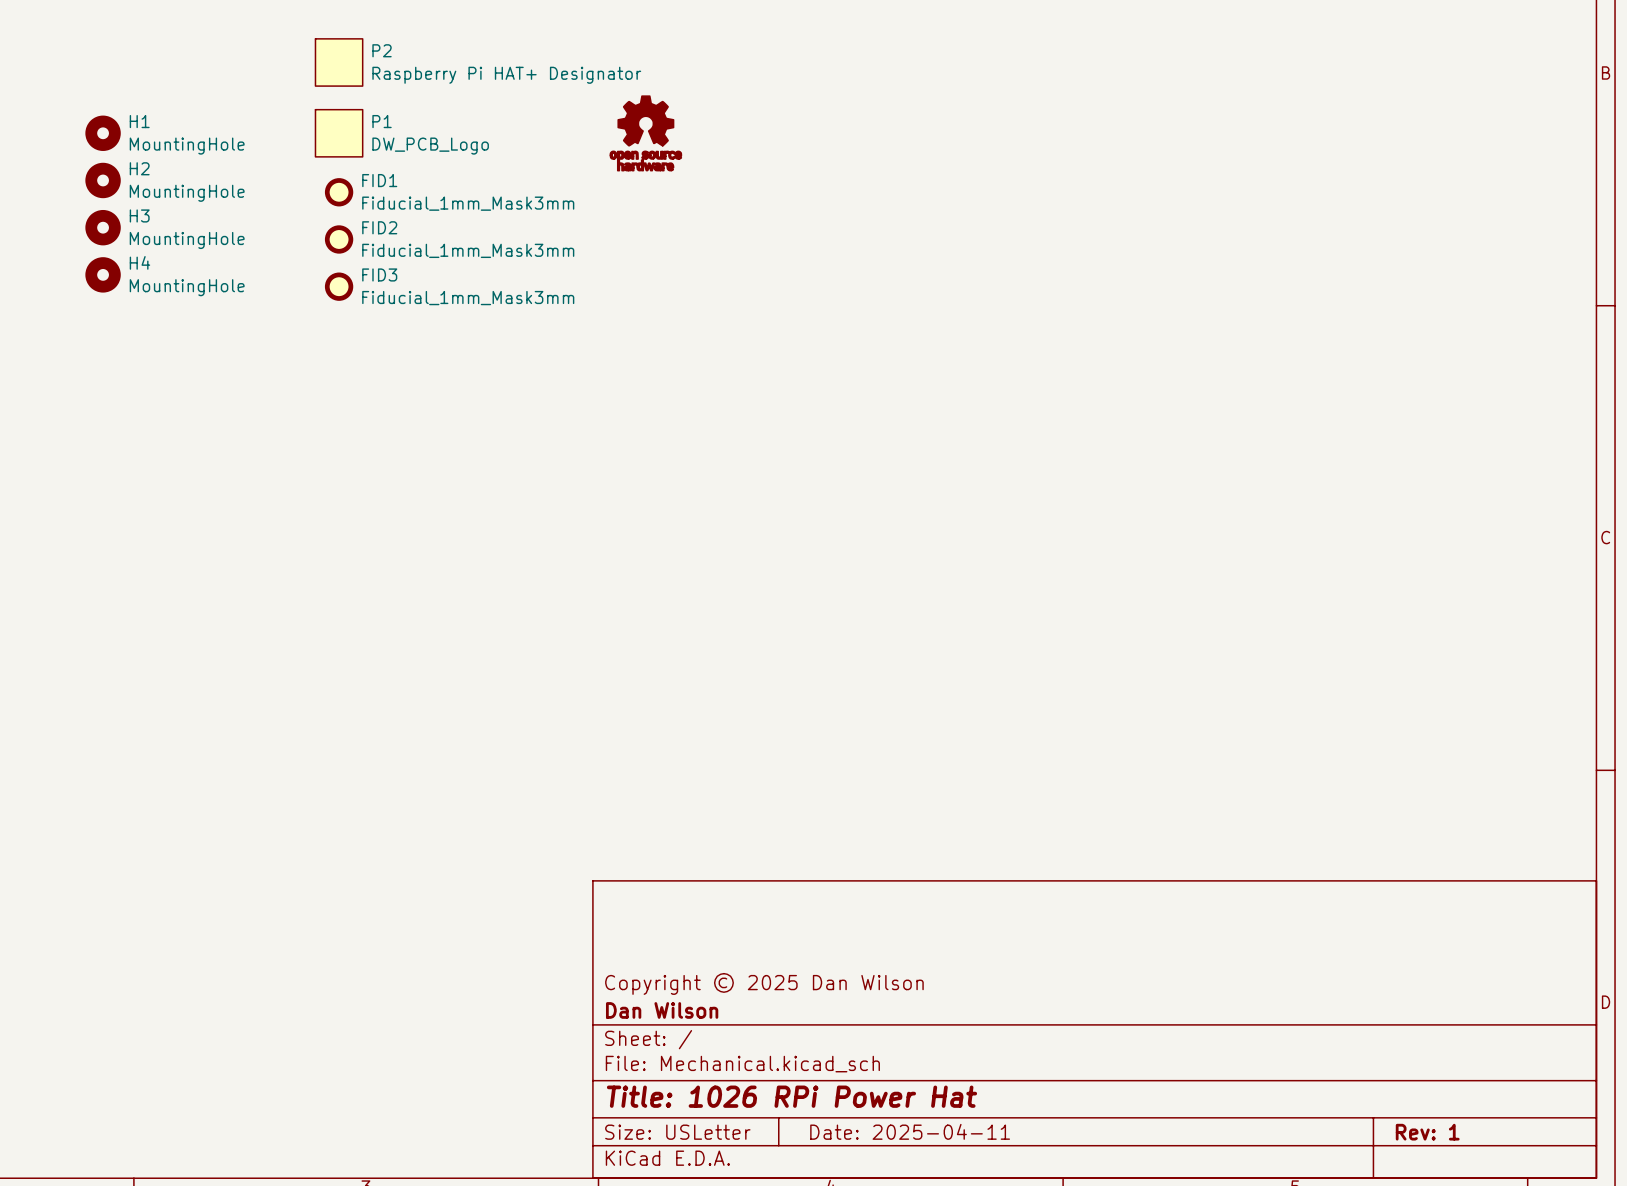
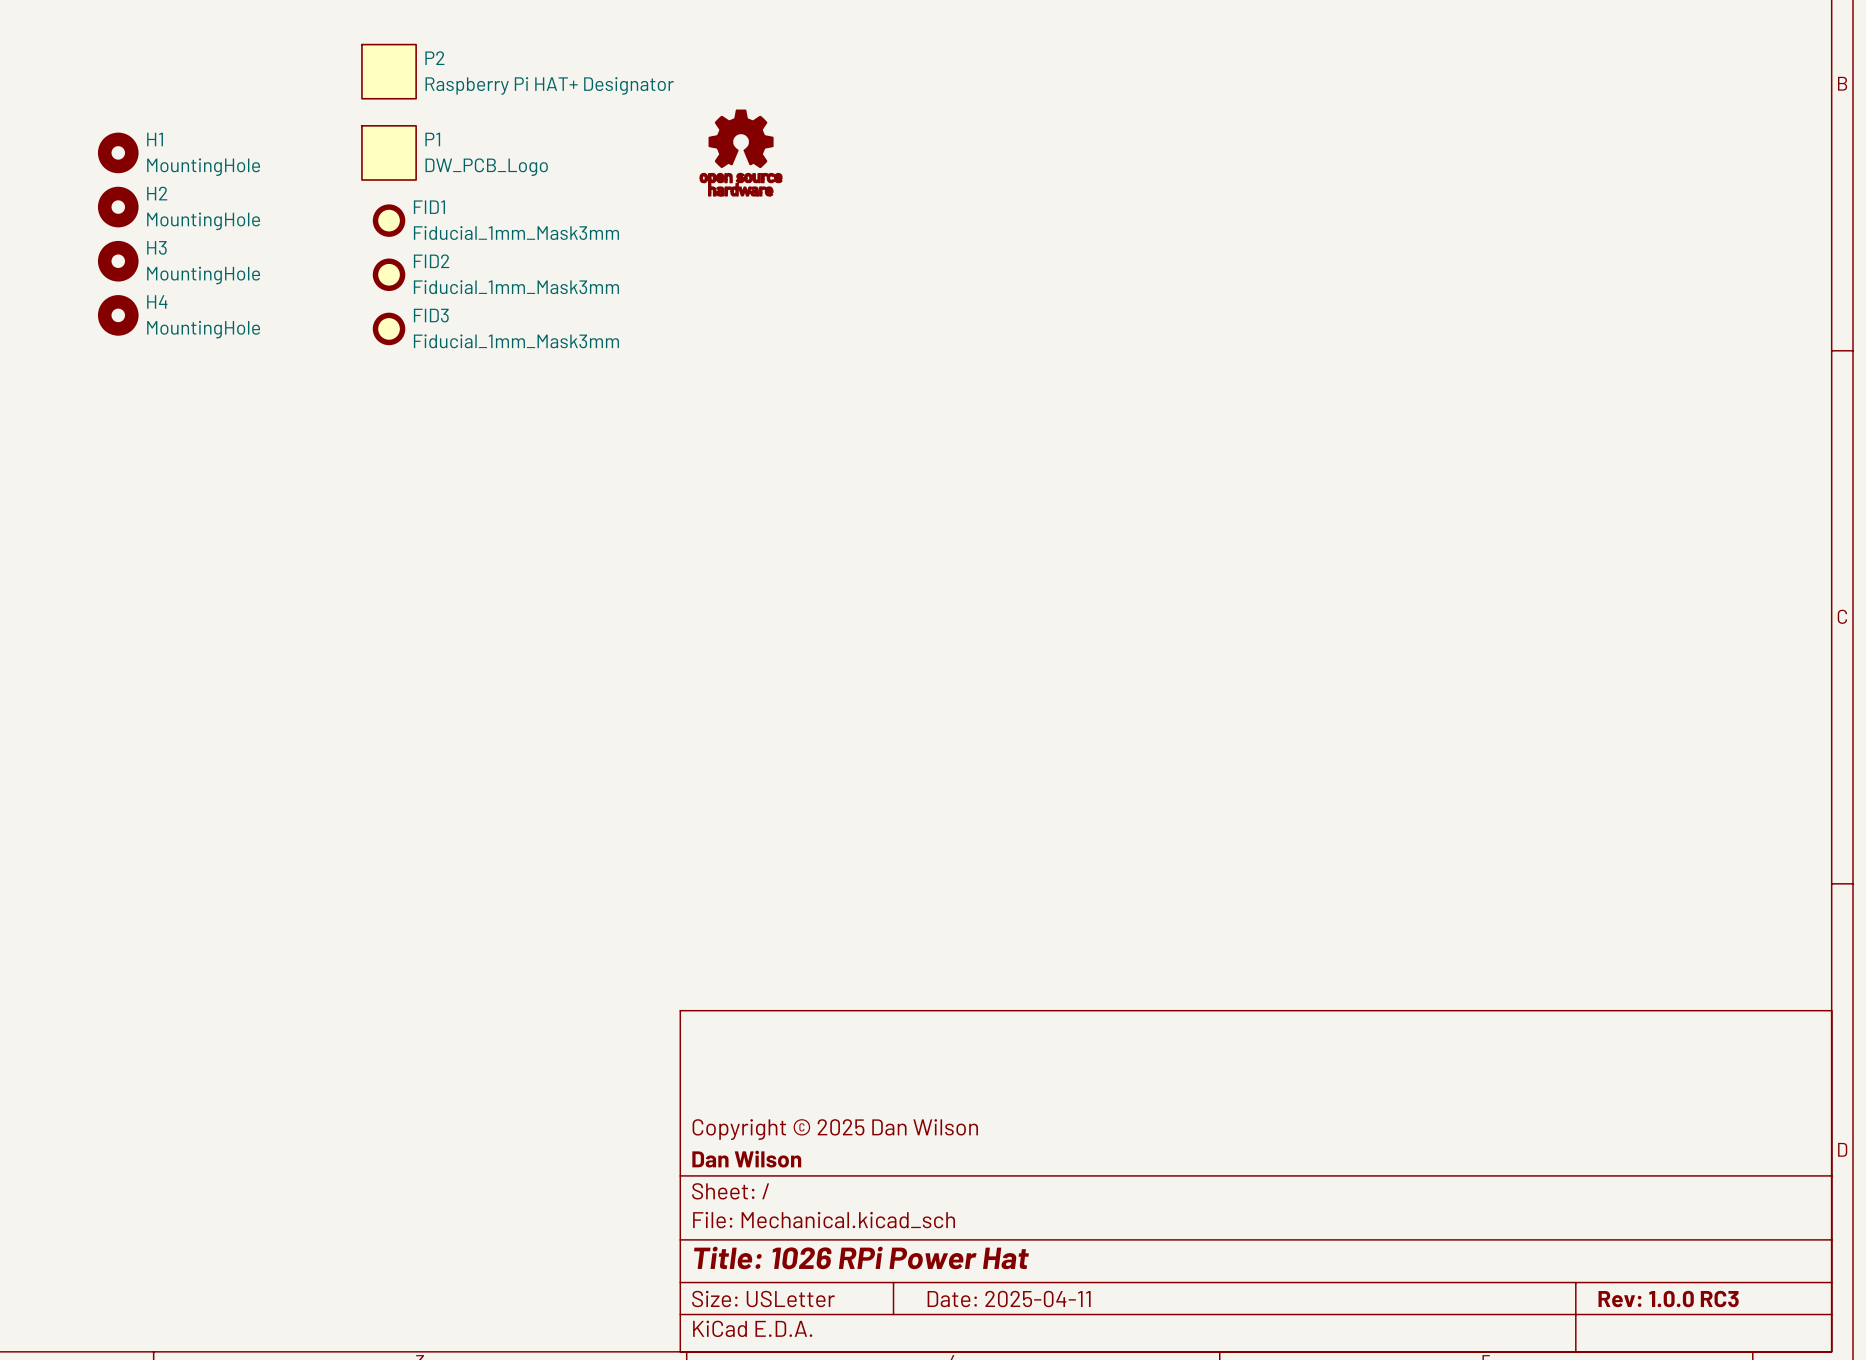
title block: Rev: 1 (1427, 1132) -> Rev: 1.0.0 RC3 (1668, 1299)

